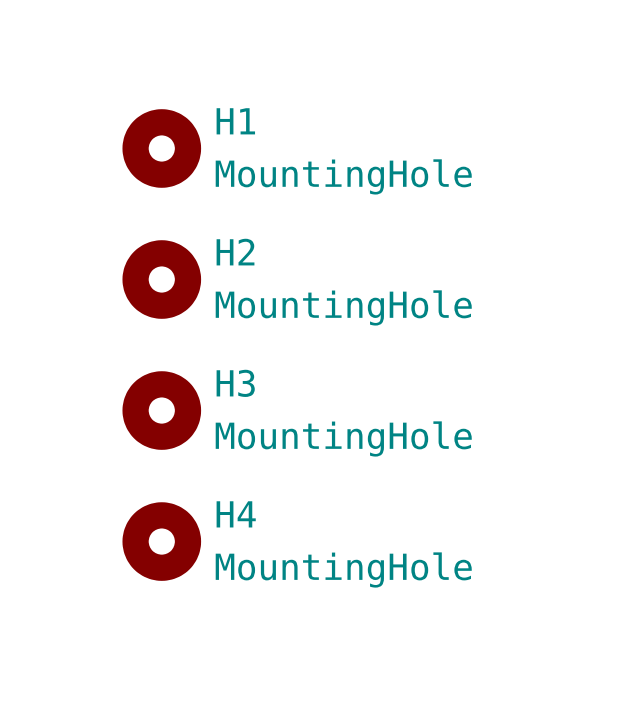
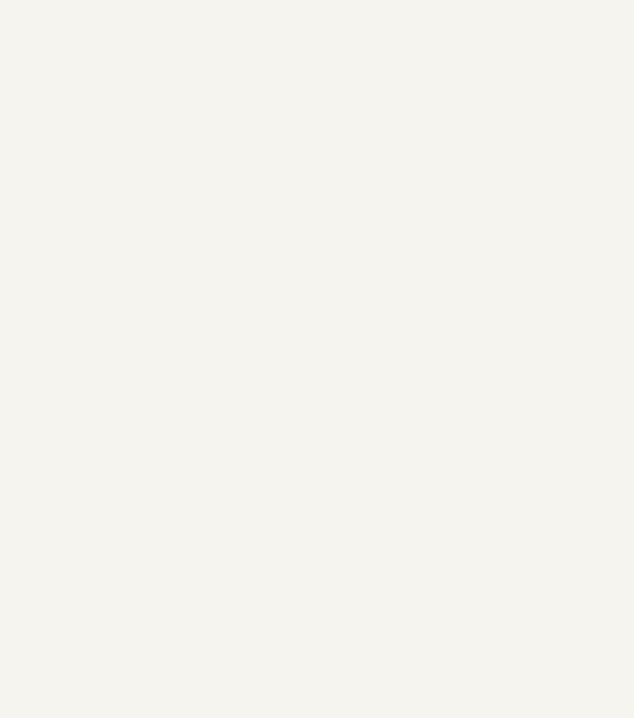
H1: MountingHole (161, 148) -> none
H2: MountingHole (161, 279) -> none
H3: MountingHole (161, 410) -> none
H4: MountingHole (161, 541) -> none

